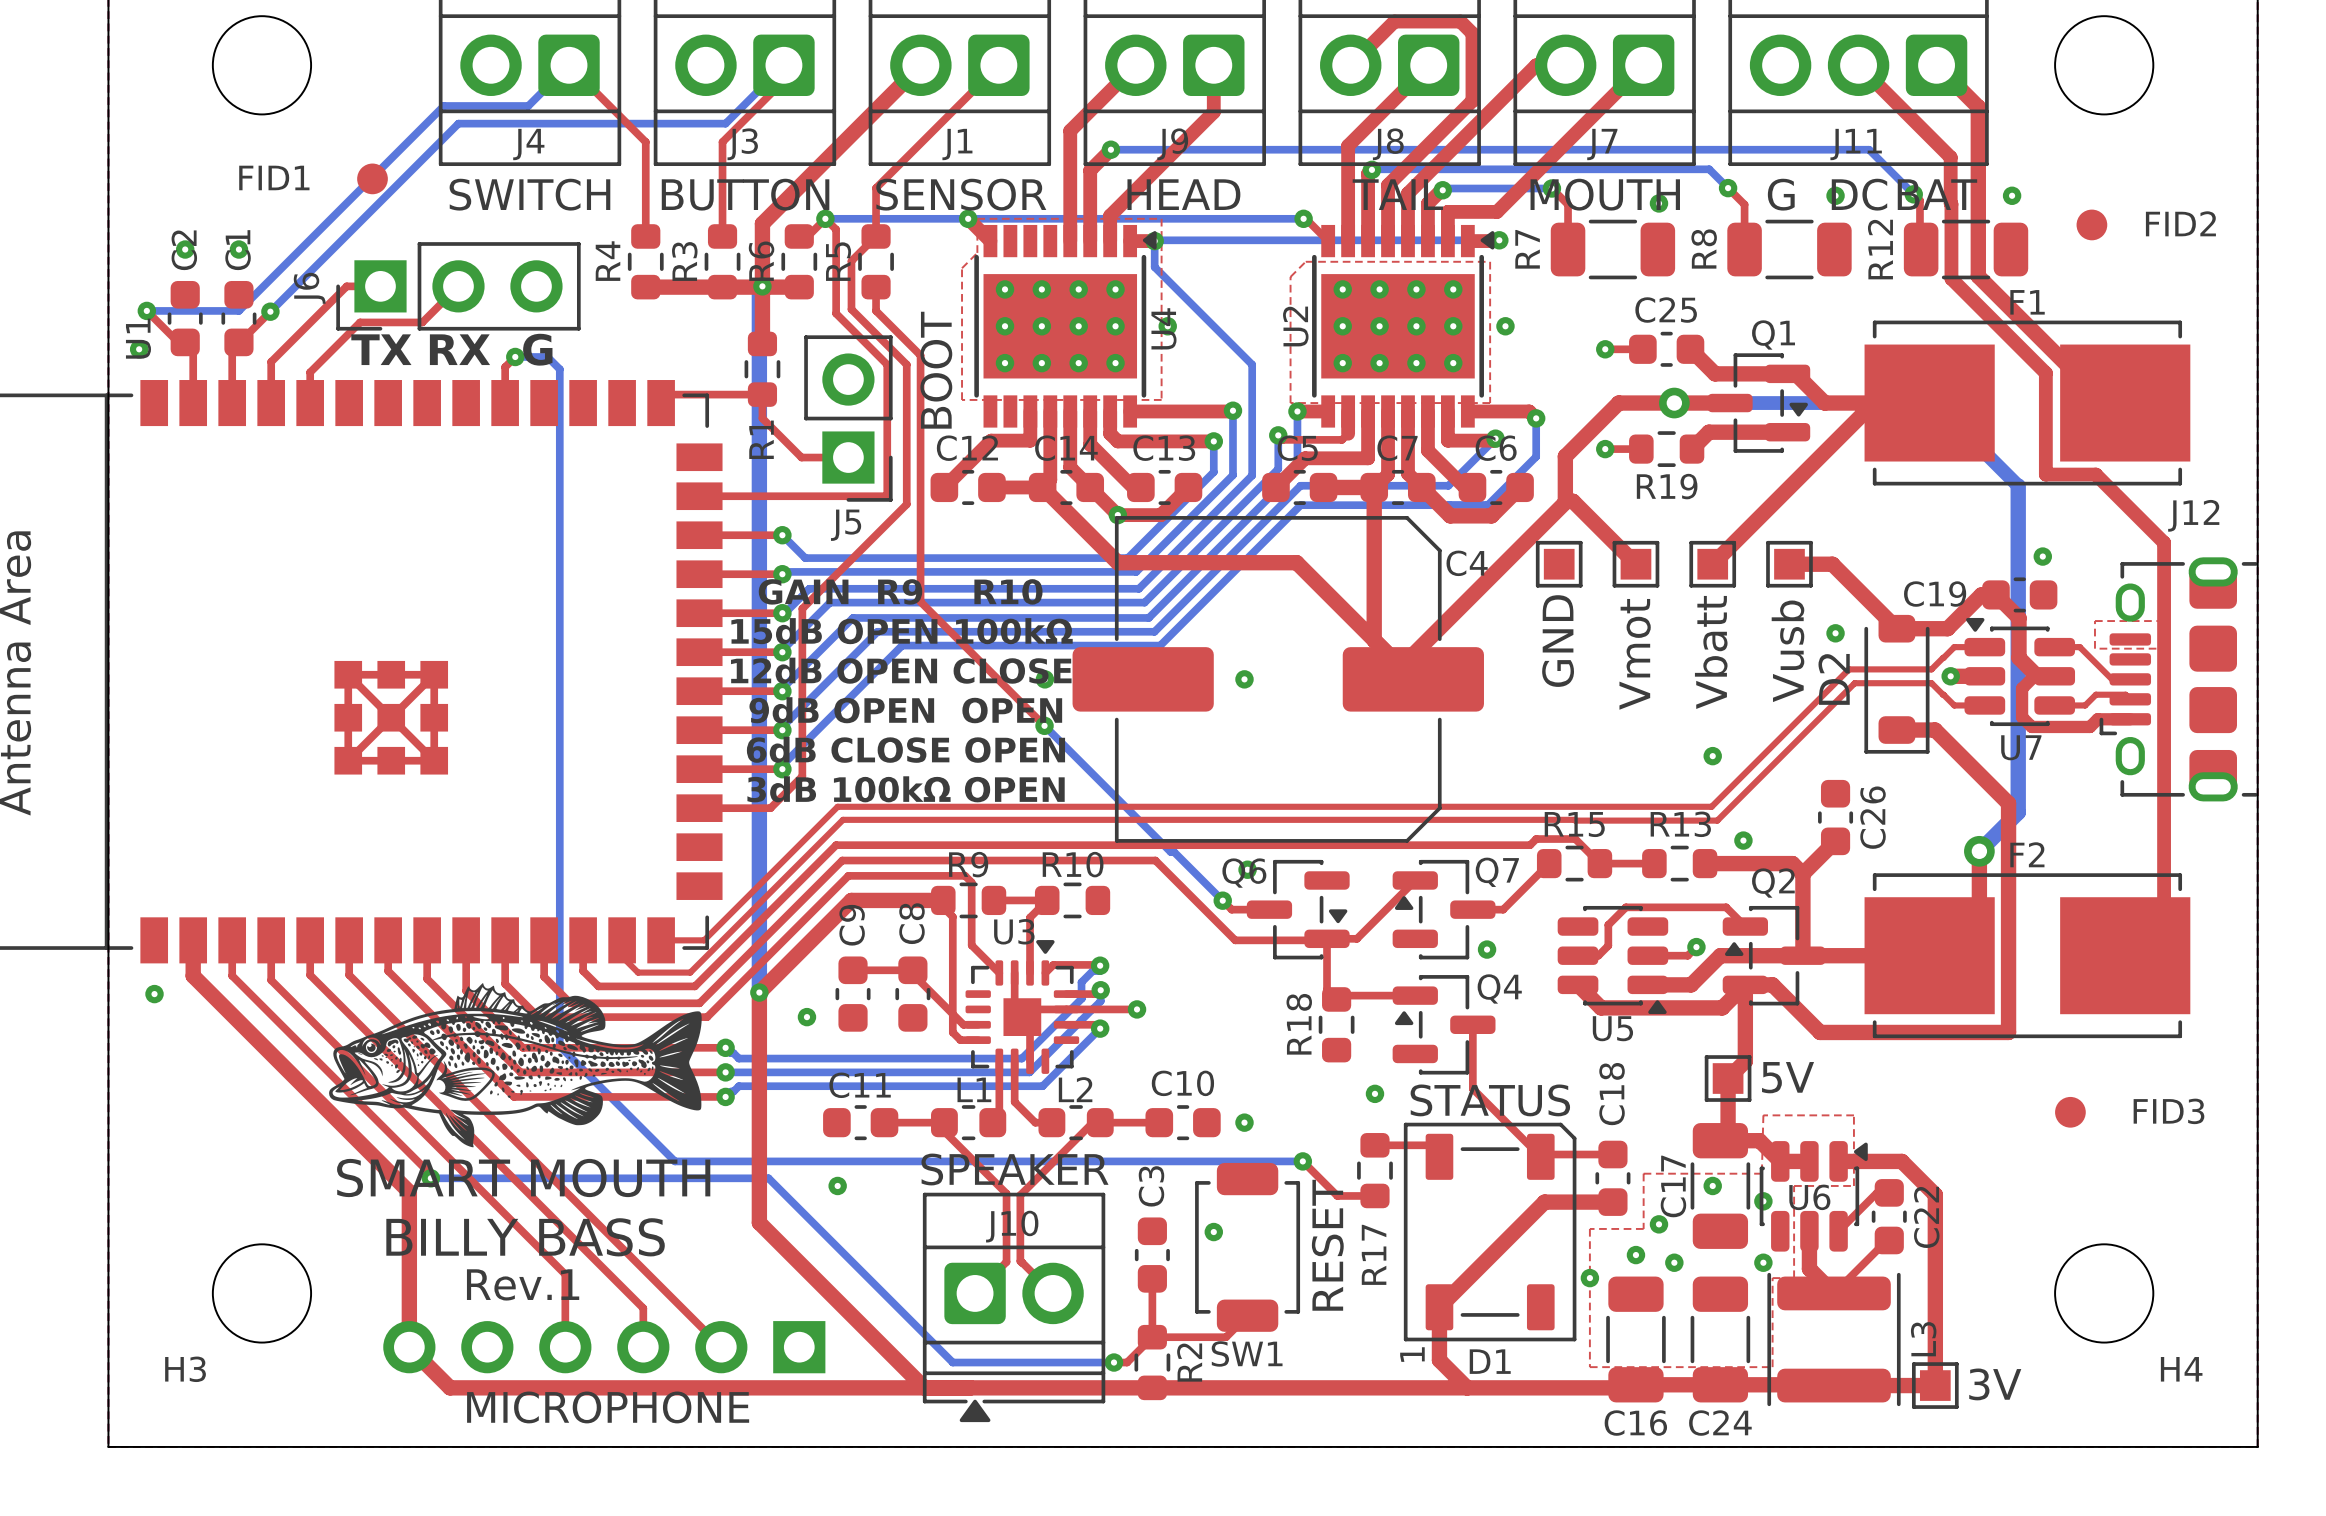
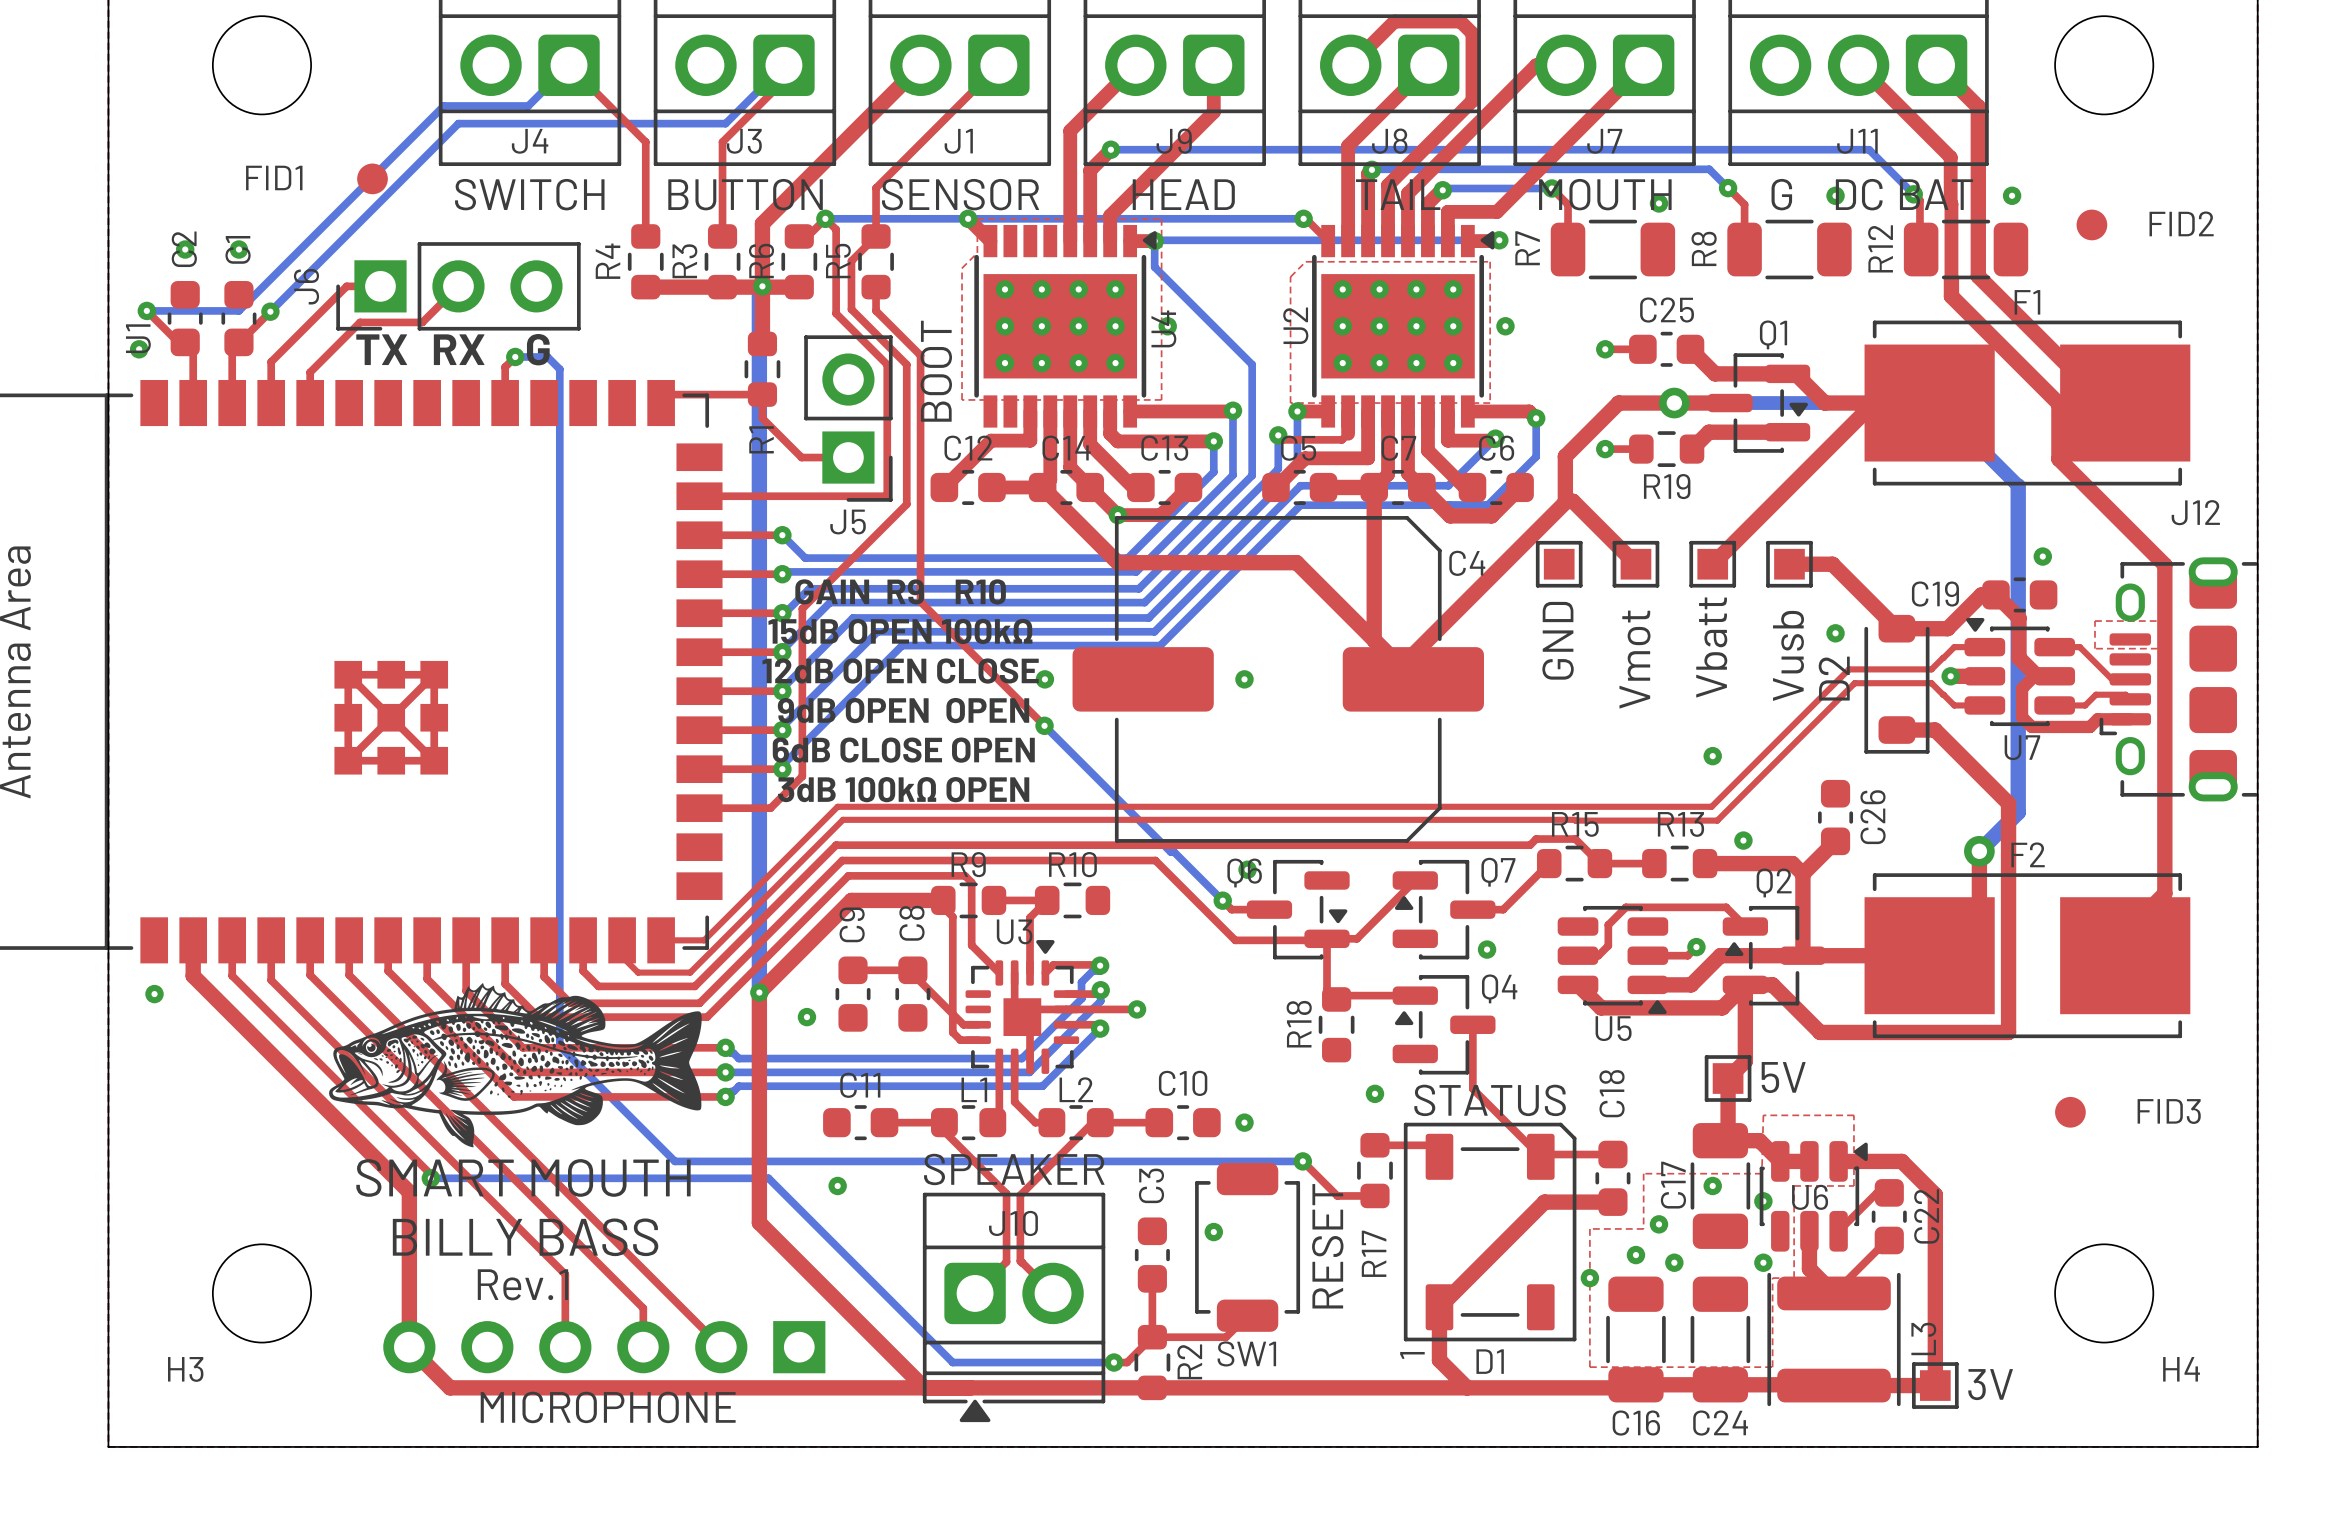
top track: (1951, 278) (2045, 373) (2045, 474) (2095, 474) (2164, 542) (2164, 916) -> (1951, 278) (1951, 296) (2058, 403) (2058, 459) (2164, 565) (2164, 893) (2102, 955)

